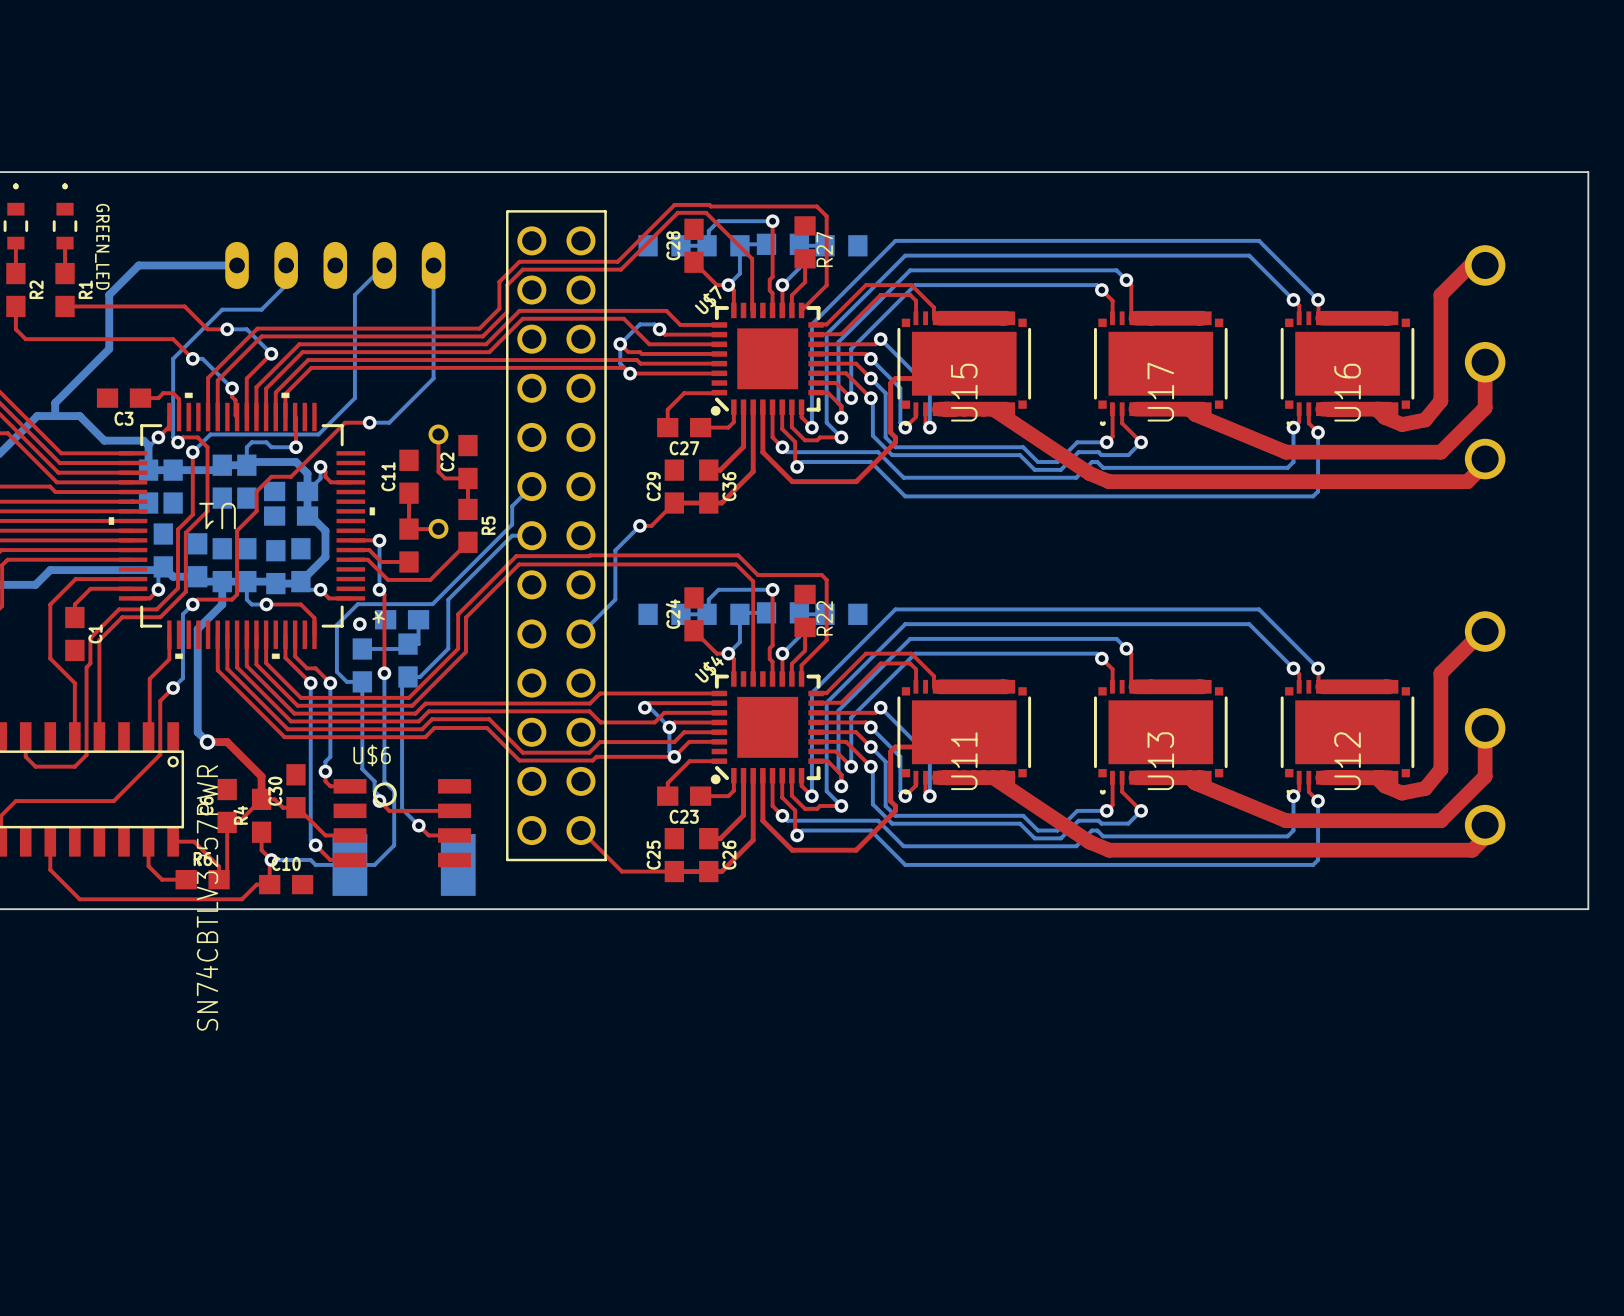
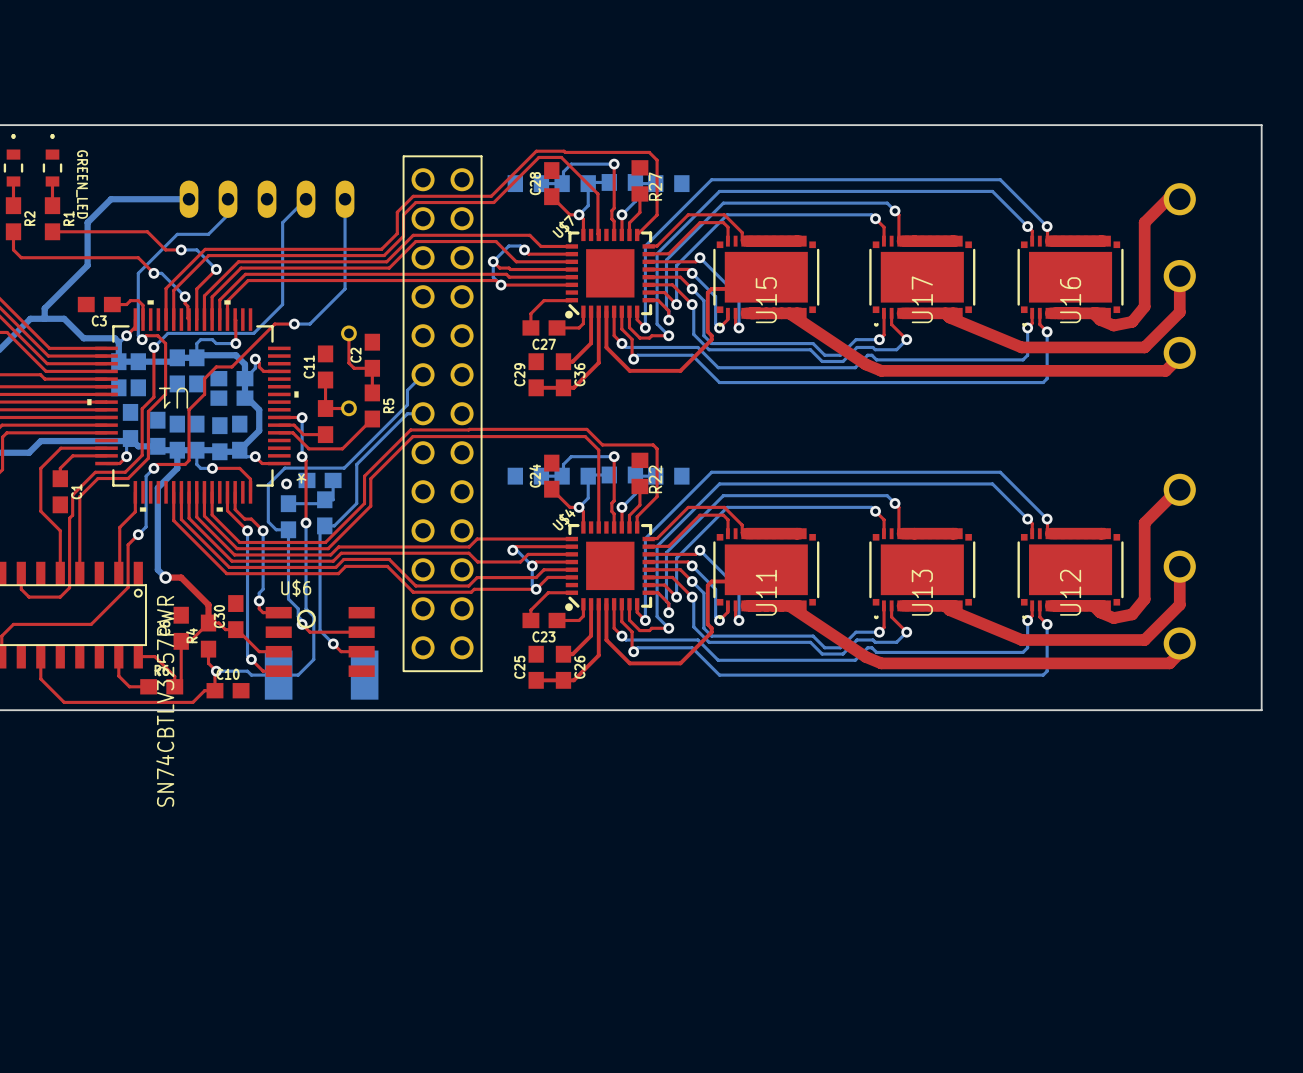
top track: (674, 503) (651, 525) (639, 525) -> none
bottom track: (639, 525) (615, 550) (615, 599) (580, 633) -> none
via: (639, 525) -> none
top track: (580, 830) (621, 871) (674, 871) -> none

